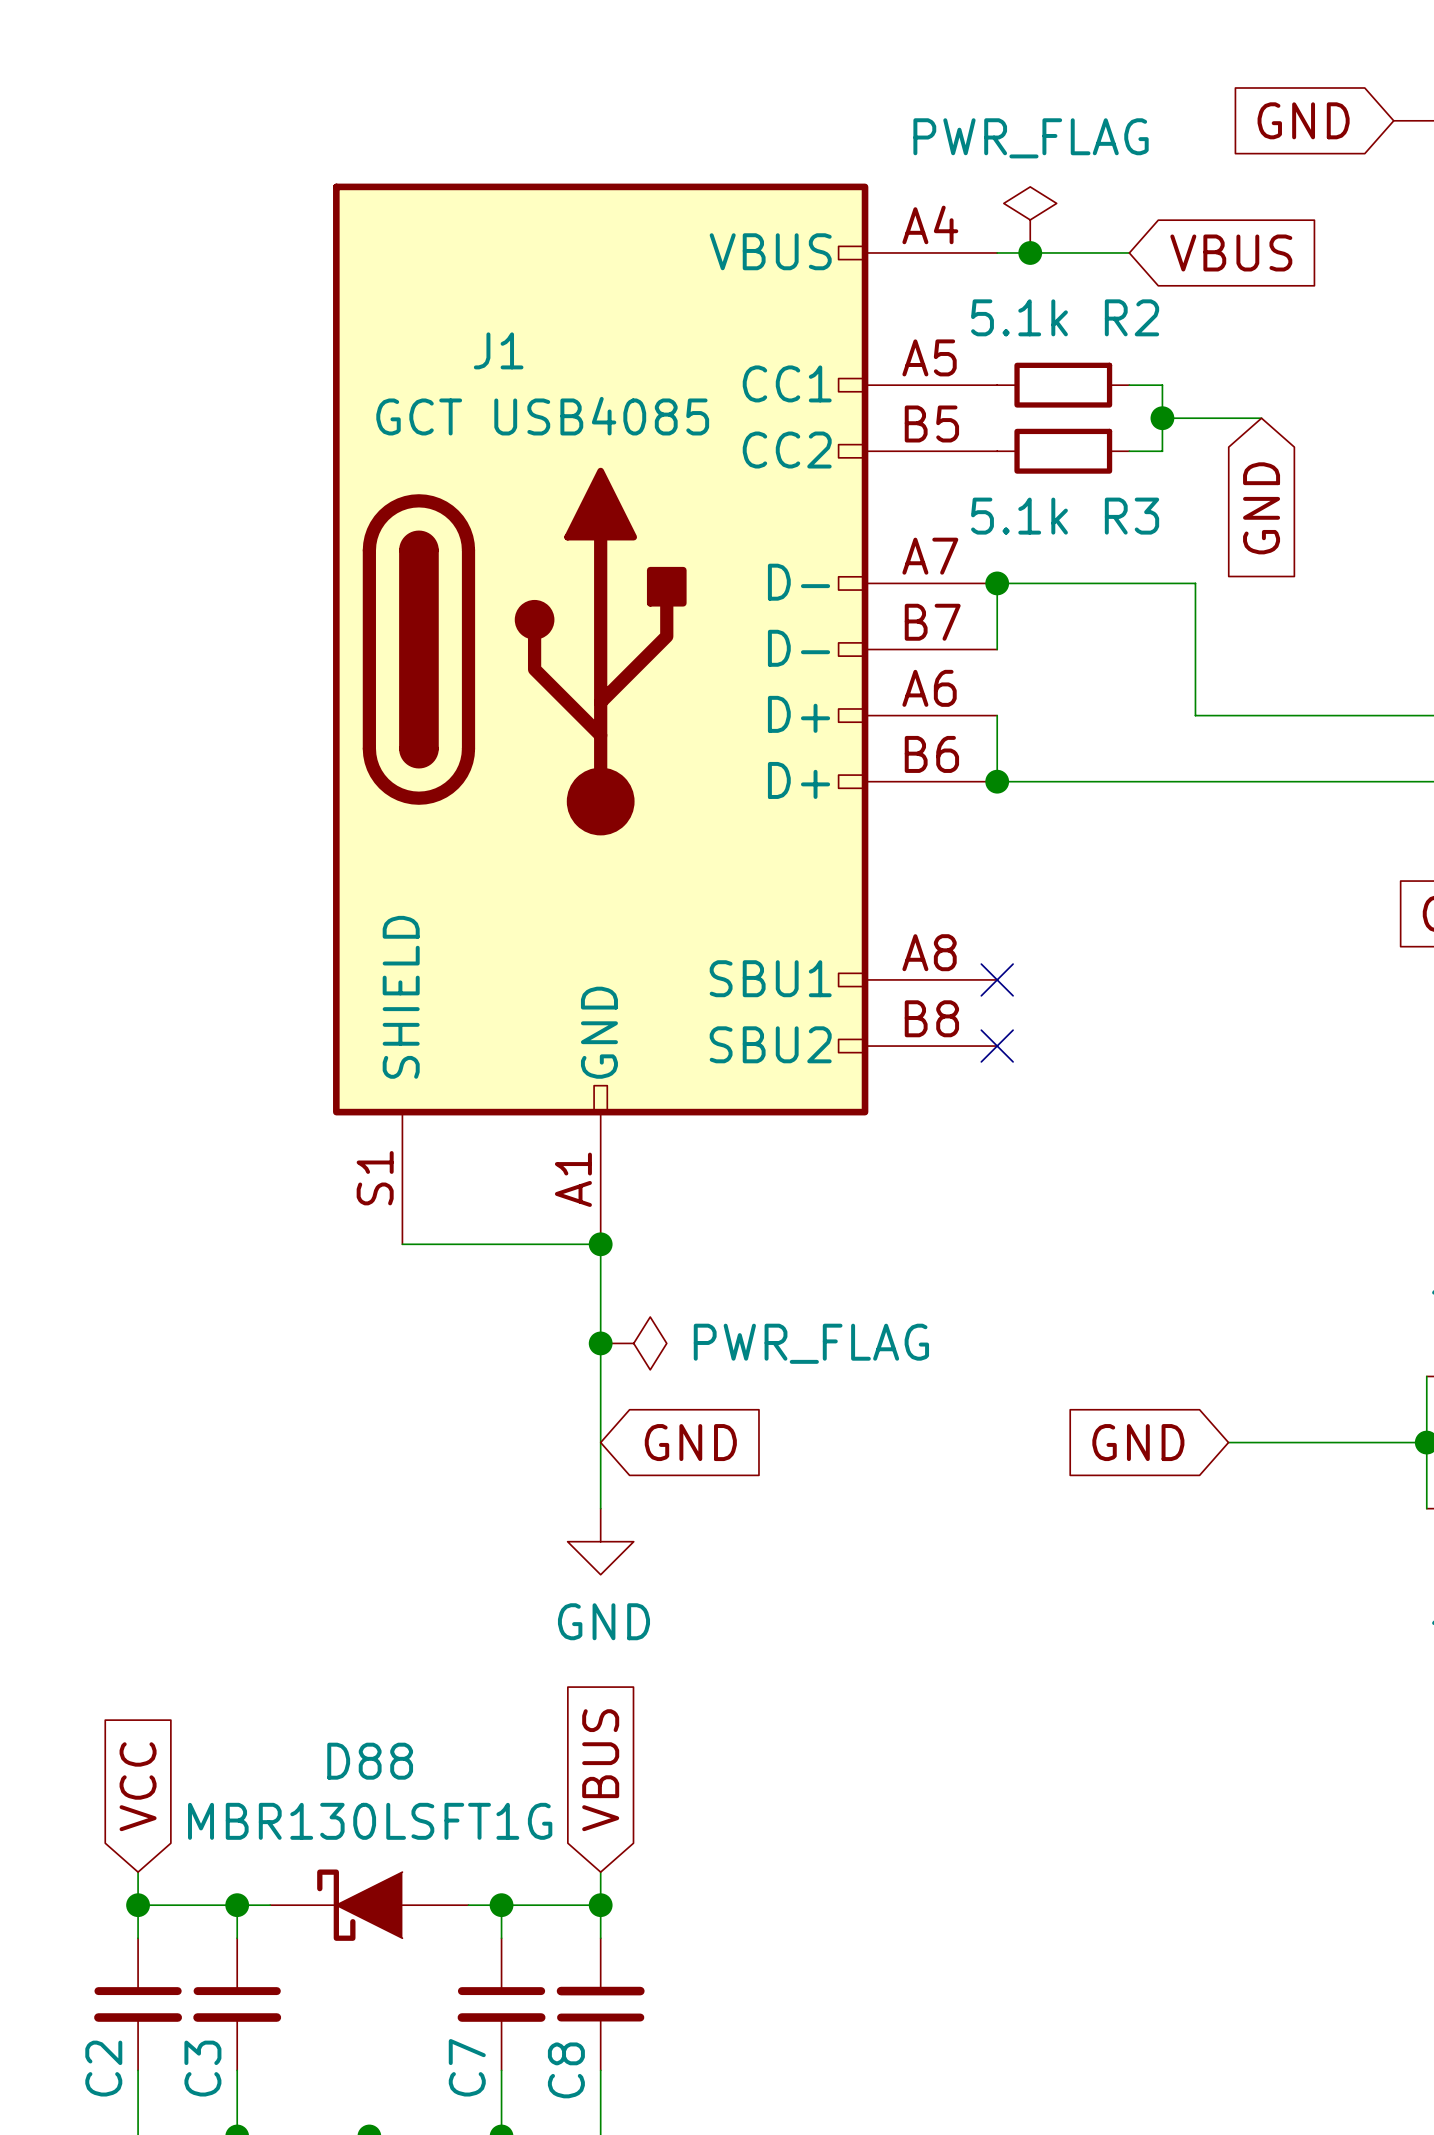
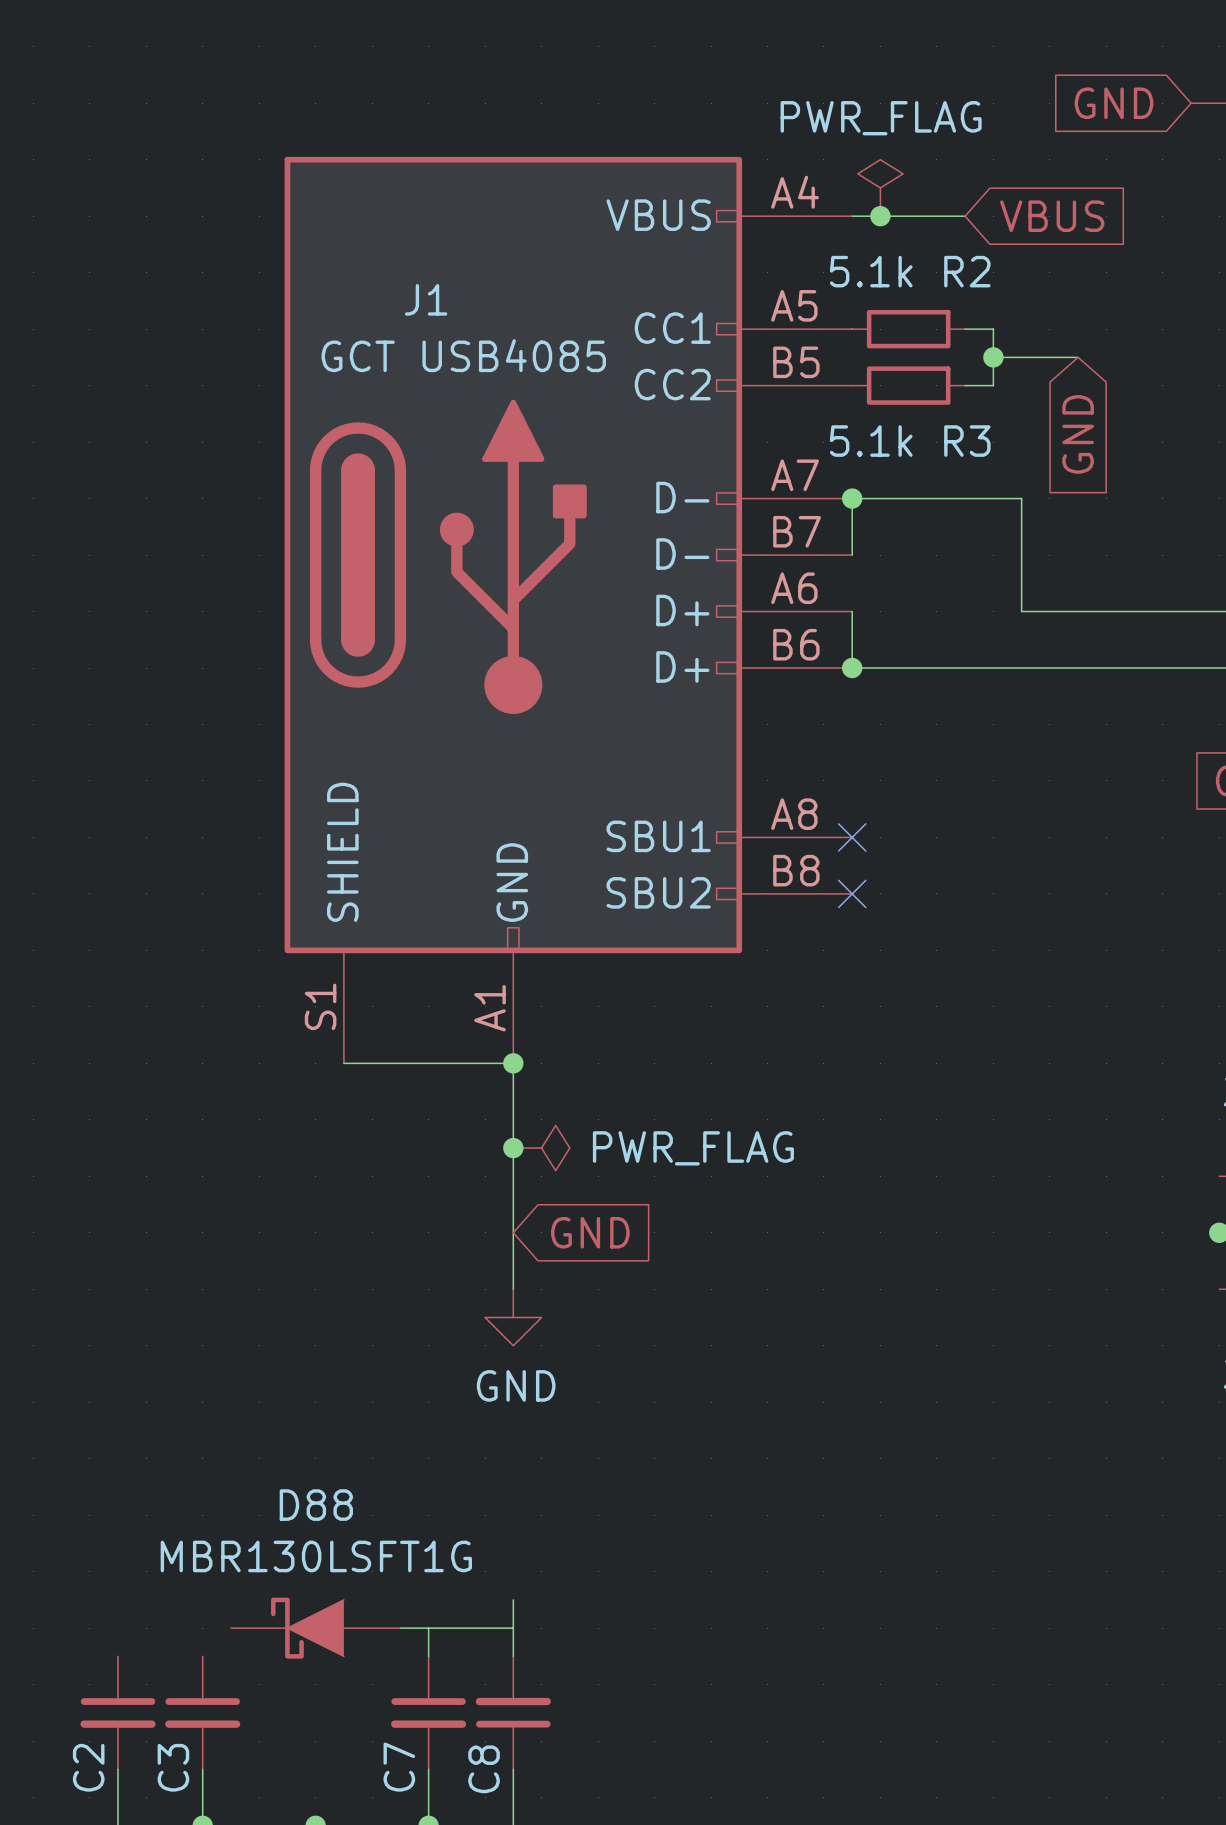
wire: (1426, 1376) (1426, 1508) -> none
global label: GND (1138, 1442) -> none
wire: (1228, 1442) (1426, 1442) -> none
global label: VBUS (600, 1770) -> none
global label: VCC (138, 1786) -> none
wire: (138, 1872) (138, 1938) -> none
wire: (138, 1905) (270, 1905) -> none
junction: (138, 1905) -> none
wire: (237, 1905) (237, 1938) -> none
junction: (237, 1905) -> none
junction: (501, 1905) -> none
junction: (600, 1905) -> none

